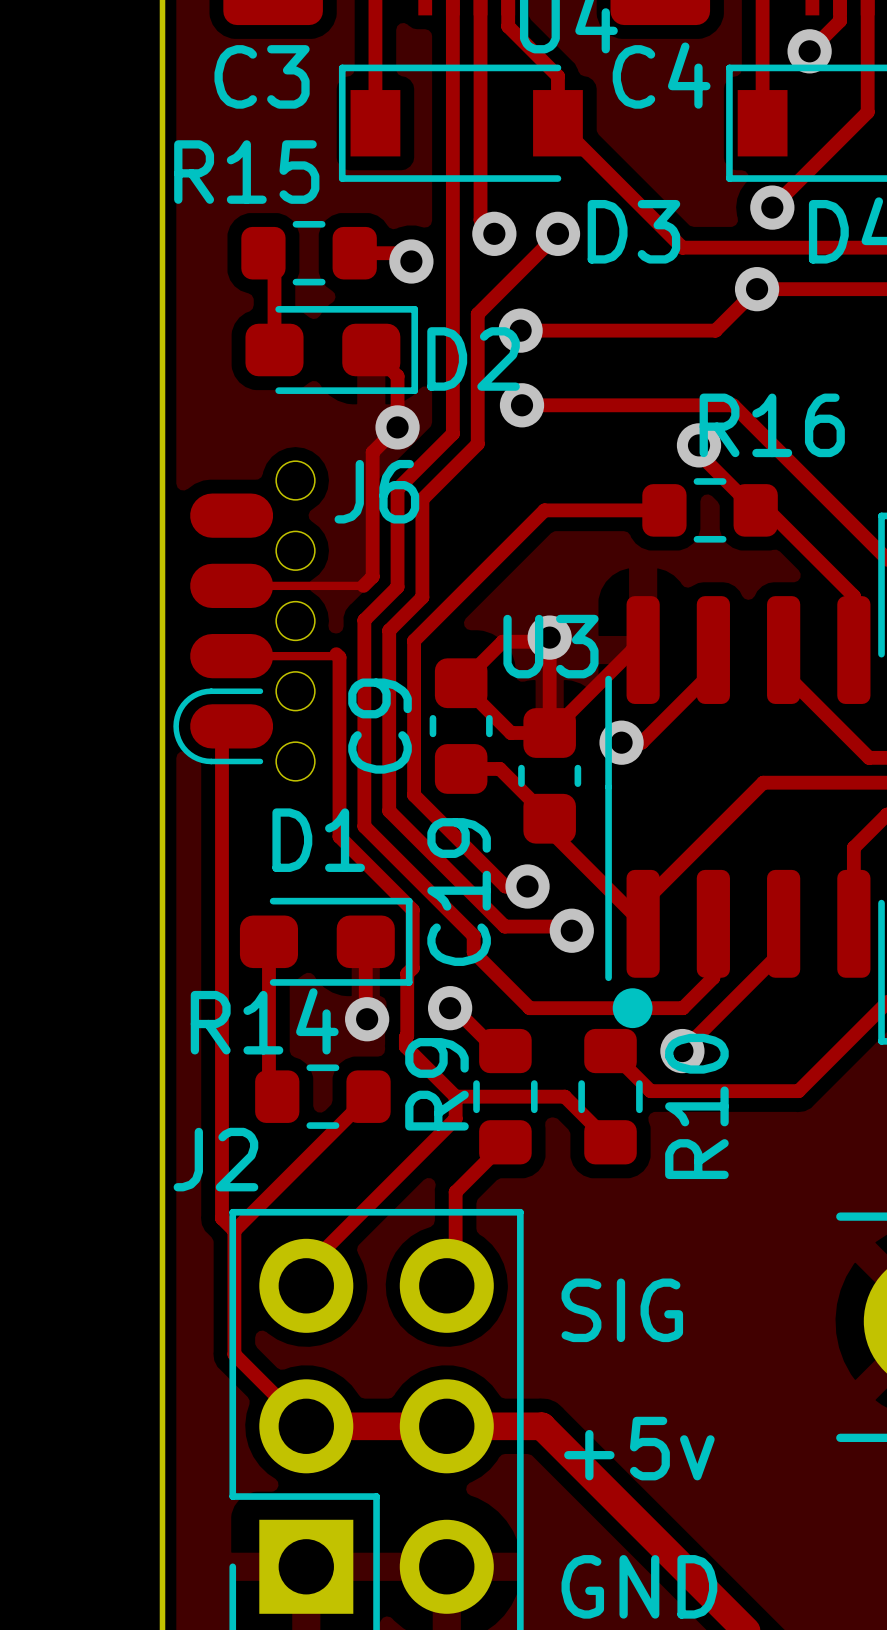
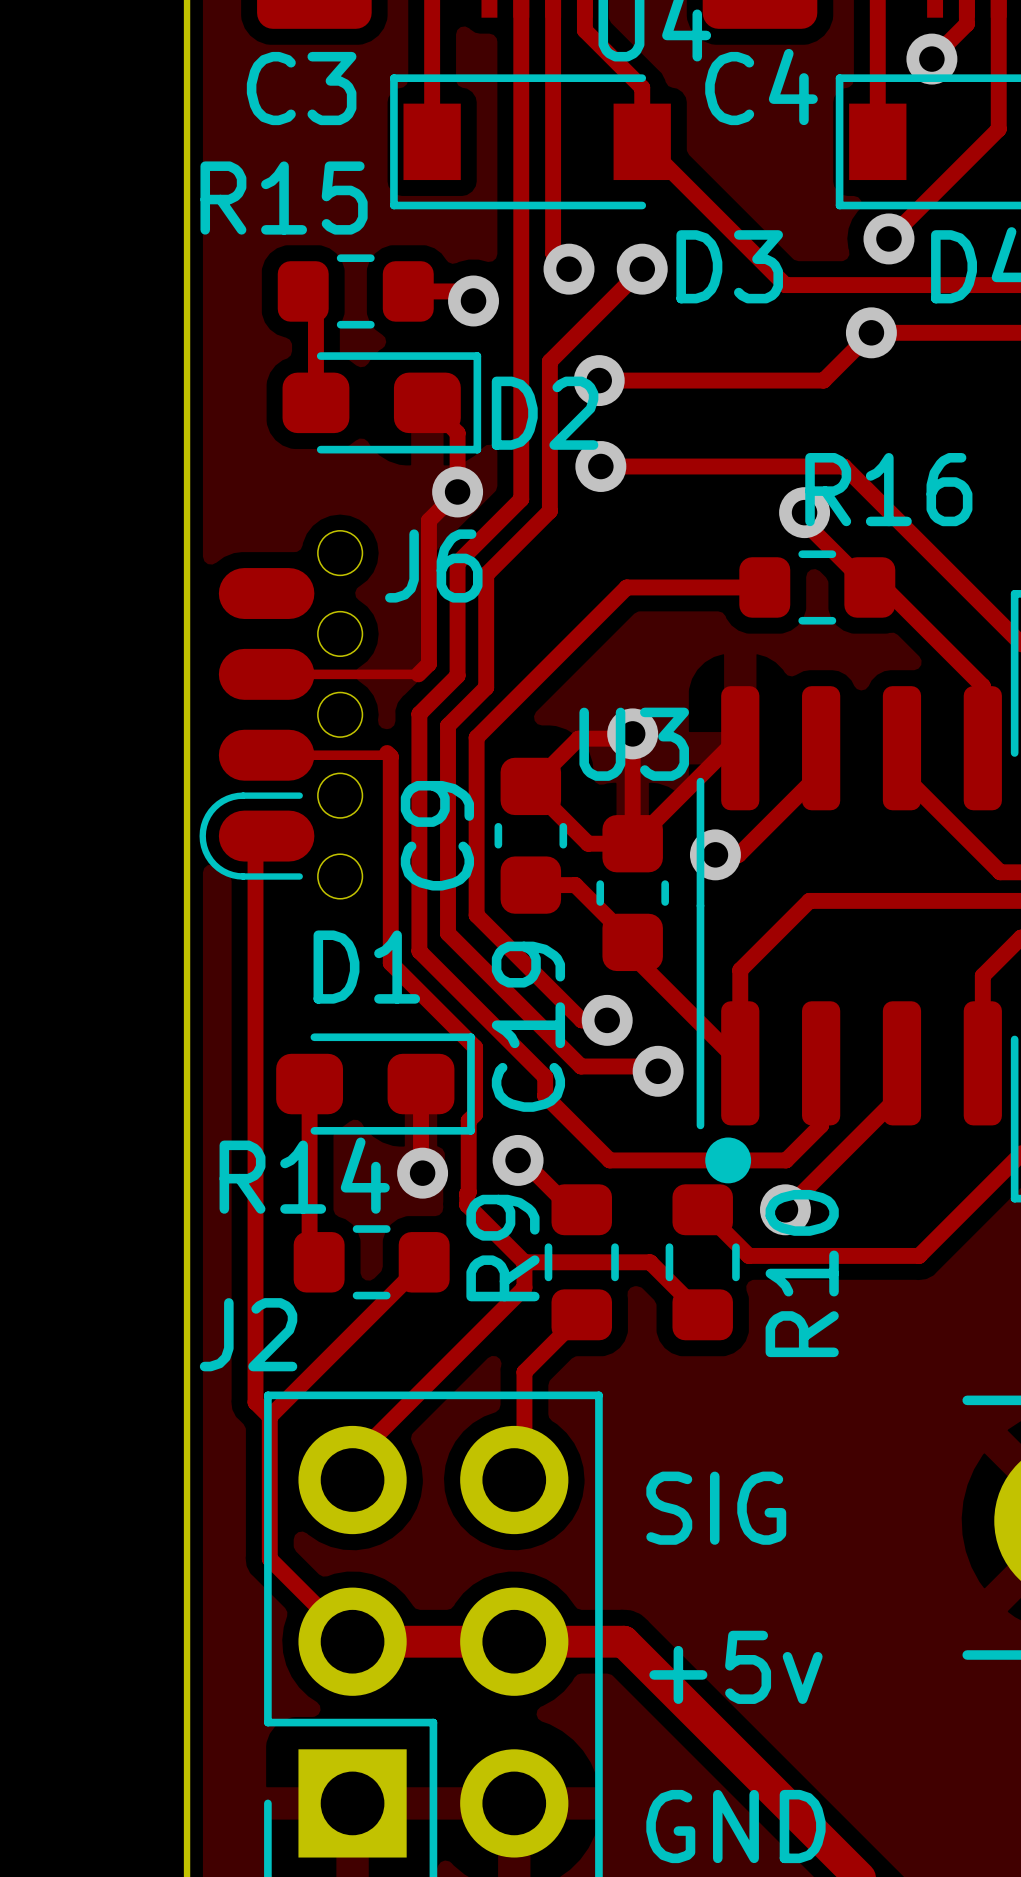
track: (763, 782) (643, 902) -> (878, 900) (809, 900) (740, 970) (740, 1039)

